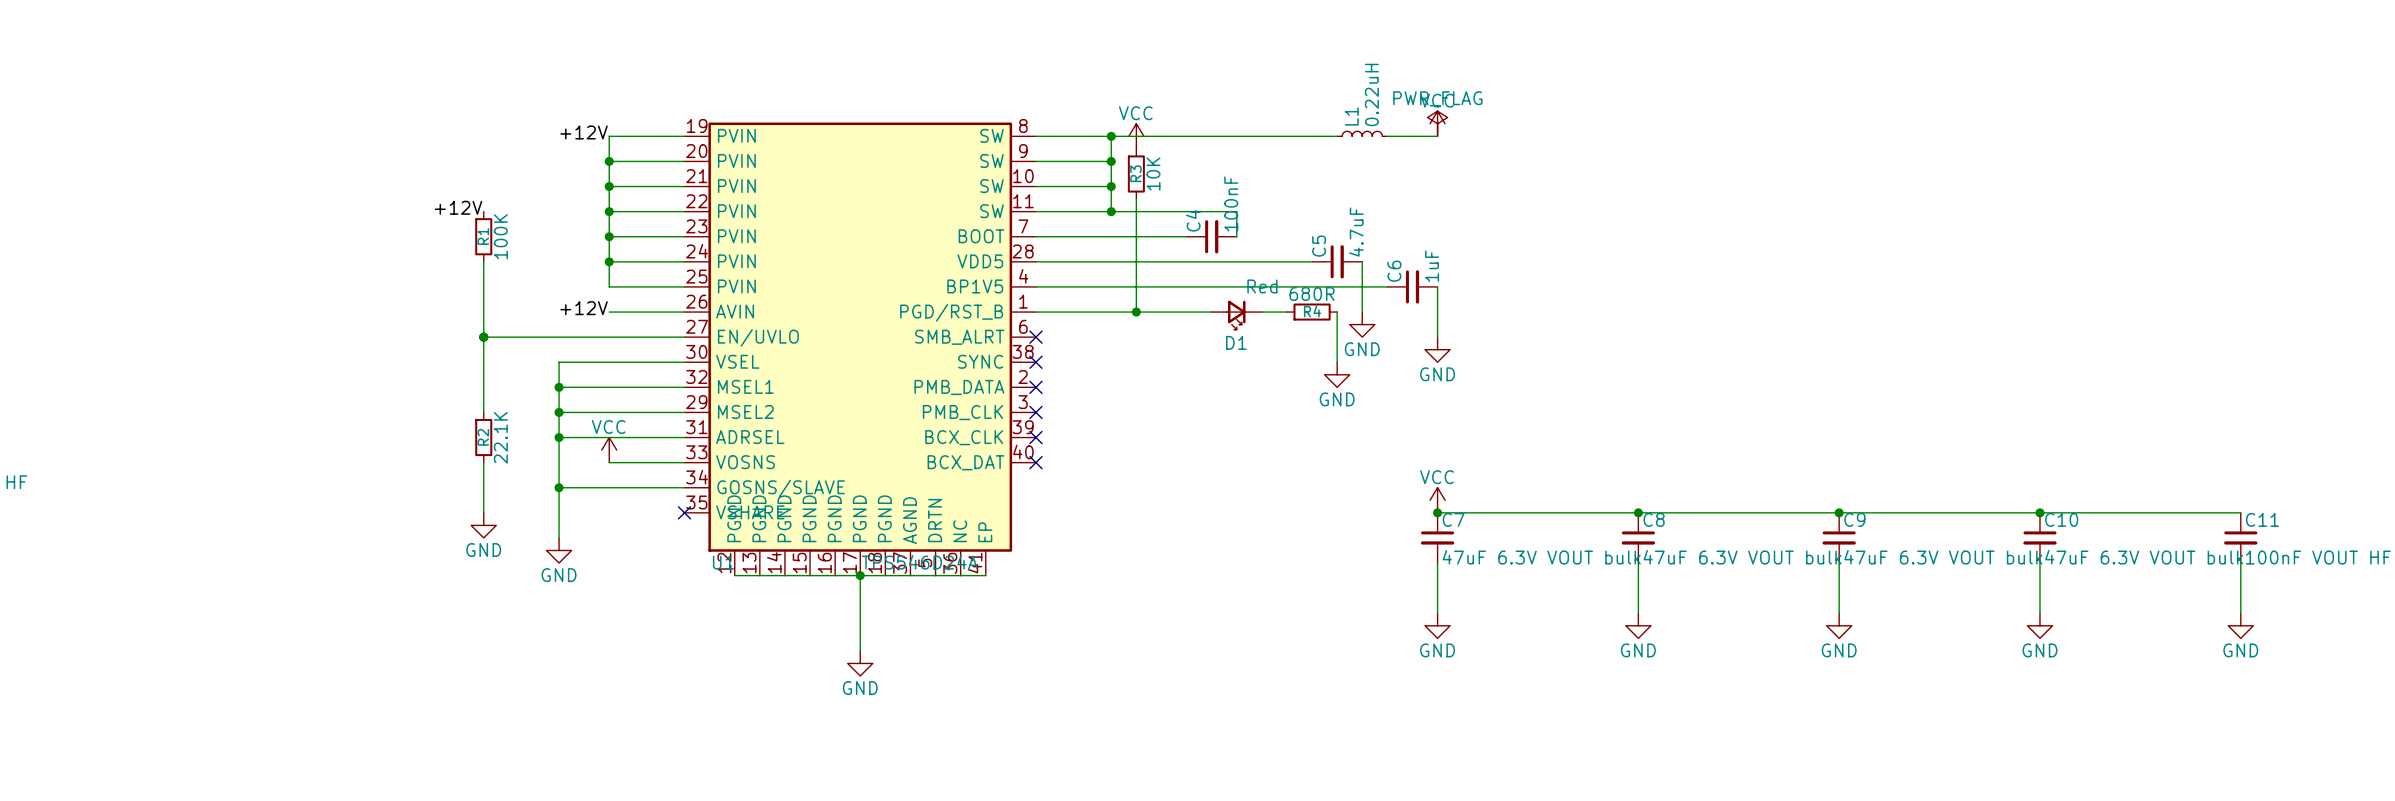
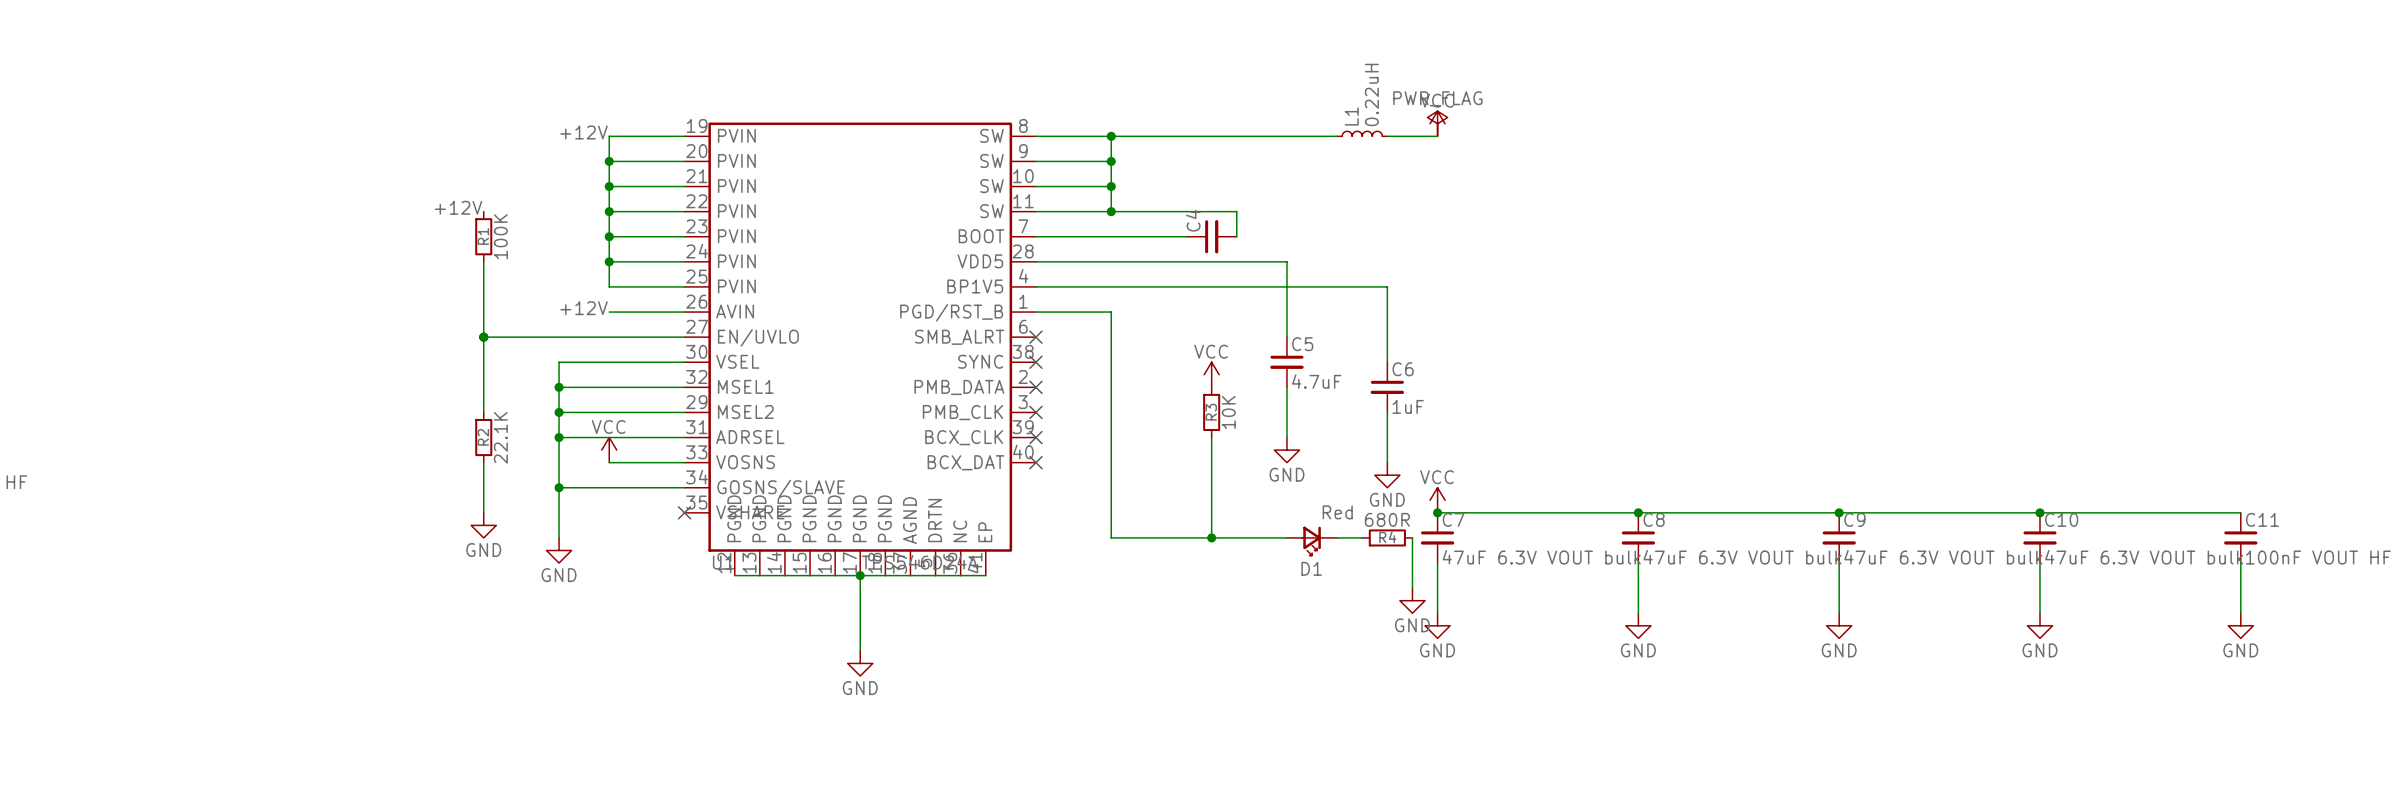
power symbol: VCC (1136, 136) -> none
R3 position: (1136, 173) -> (1211, 412)
wire: (1136, 199) (1136, 312) -> none
C4 value: 100nF (1231, 203) -> none
wire: (1286, 261) (1312, 261) -> (1286, 261) (1286, 337)
C5 rotation: 0° (1337, 261) -> 90° clockwise (1286, 362)
C5 position: (1337, 261) -> (1286, 362)
wire: (1362, 261) (1362, 312) -> (1286, 387) (1286, 437)
wire: none -> (1387, 286) (1387, 362)
C6 rotation: 0° (1412, 286) -> 90° clockwise (1387, 387)
C6 position: (1412, 286) -> (1387, 387)
wire: (1437, 286) (1437, 337) -> (1387, 412) (1387, 462)
wire: (1111, 312) (1211, 312) -> (1111, 312) (1111, 537) (1286, 537)
junction: (1136, 312) -> none
wire: (1261, 312) (1286, 312) -> (1337, 537) (1362, 537)
R4 position: (1312, 312) -> (1387, 537)
wire: (1337, 312) (1337, 362) -> (1412, 537) (1412, 588)
D1 position: (1236, 315) -> (1312, 541)
power symbol: GND (1362, 324) -> none
power symbol: GND (1437, 349) -> none
power symbol: none -> VCC (1211, 374)
power symbol: GND (1337, 374) -> none
wire: none -> (1211, 437) (1211, 537)
power symbol: none -> GND (1286, 450)
power symbol: none -> GND (1387, 475)
junction: none -> (1211, 537)
power symbol: none -> GND (1412, 600)

